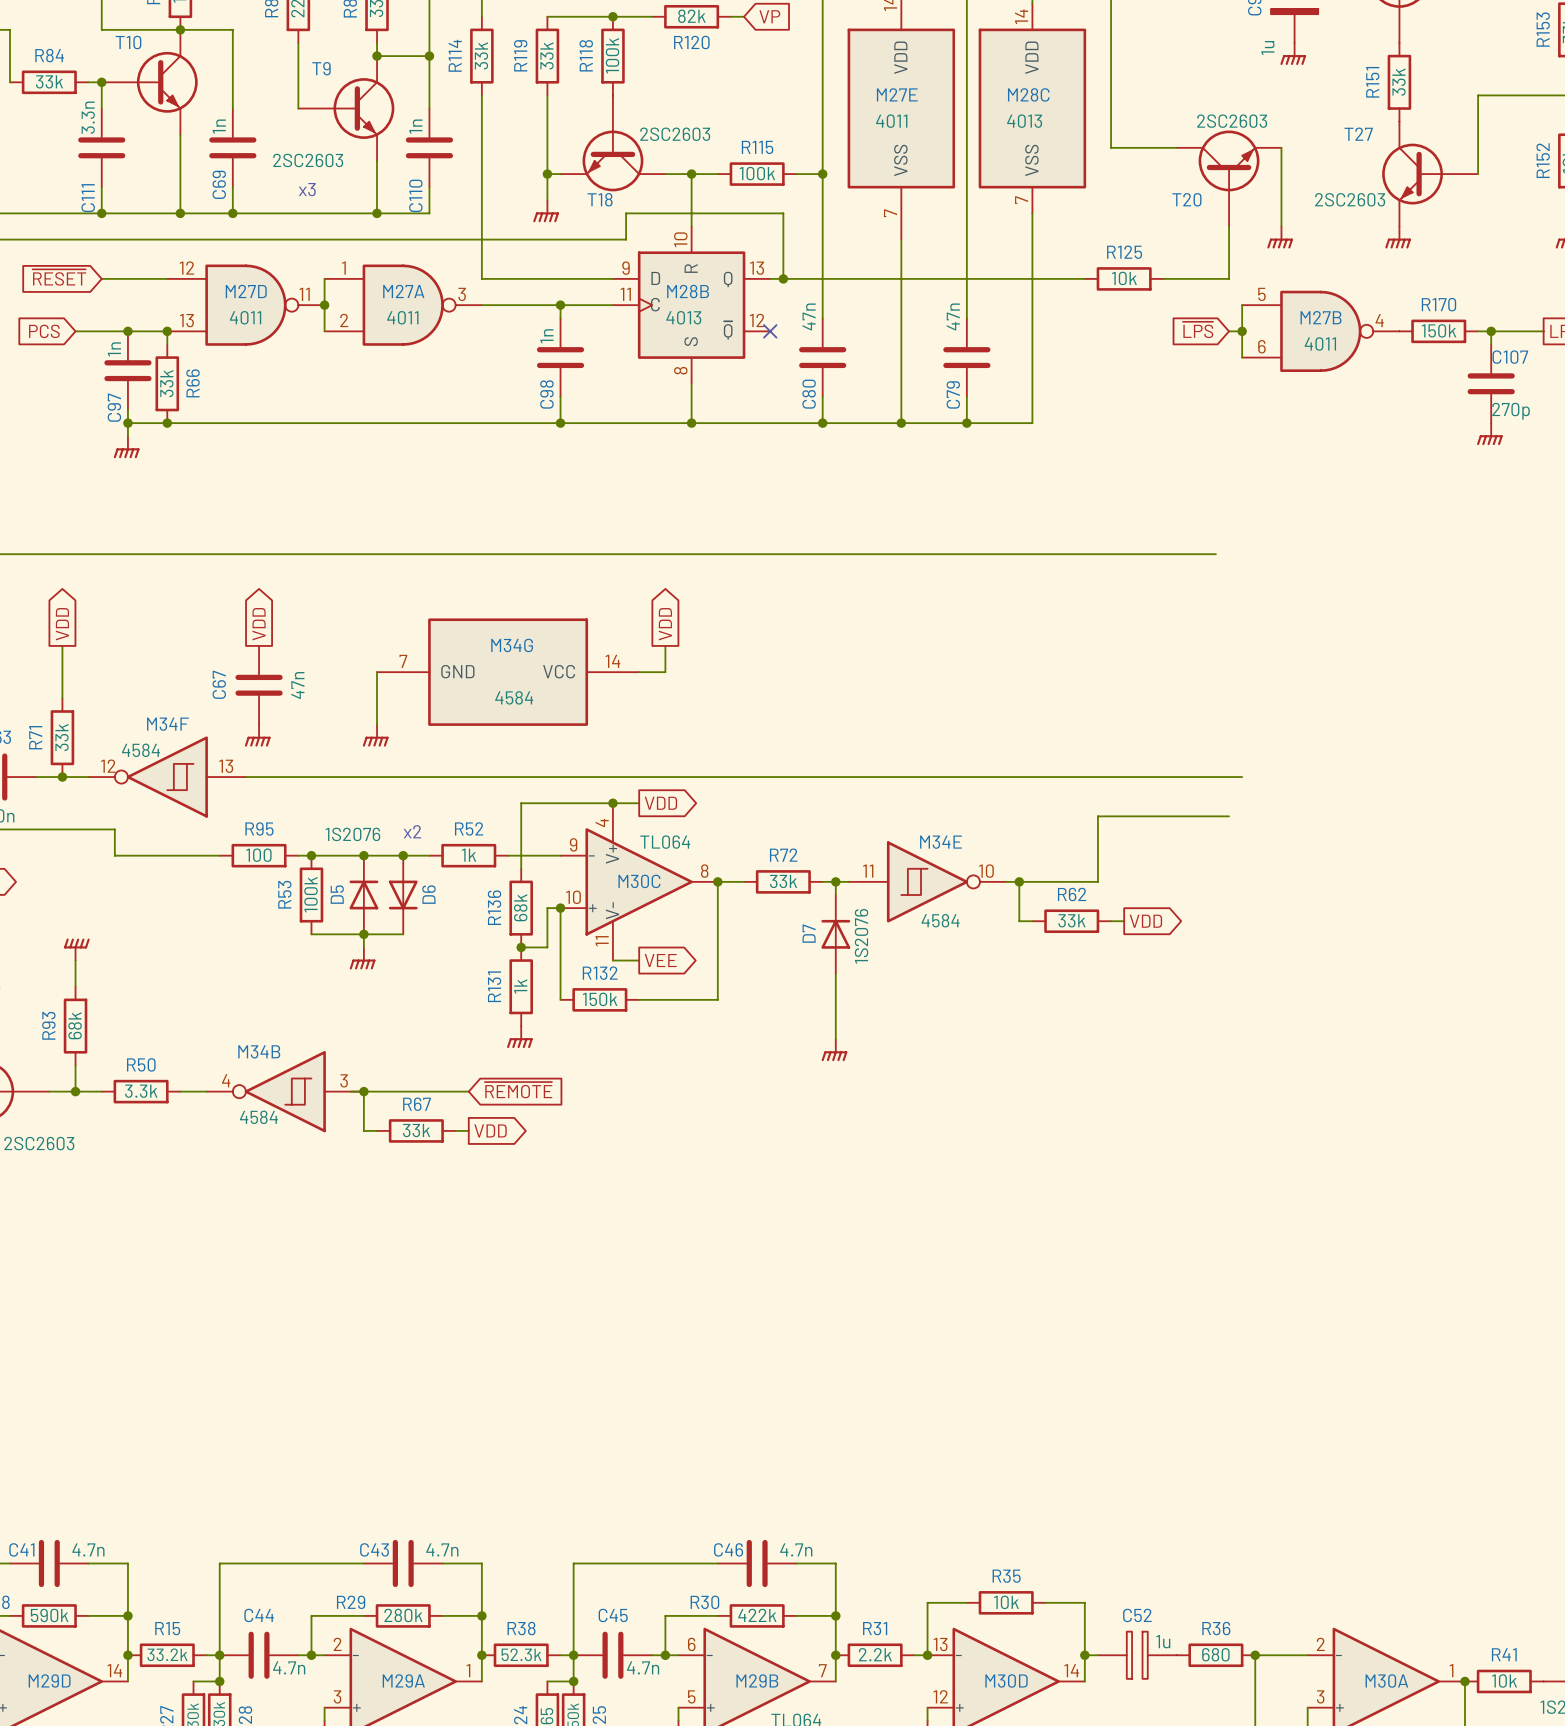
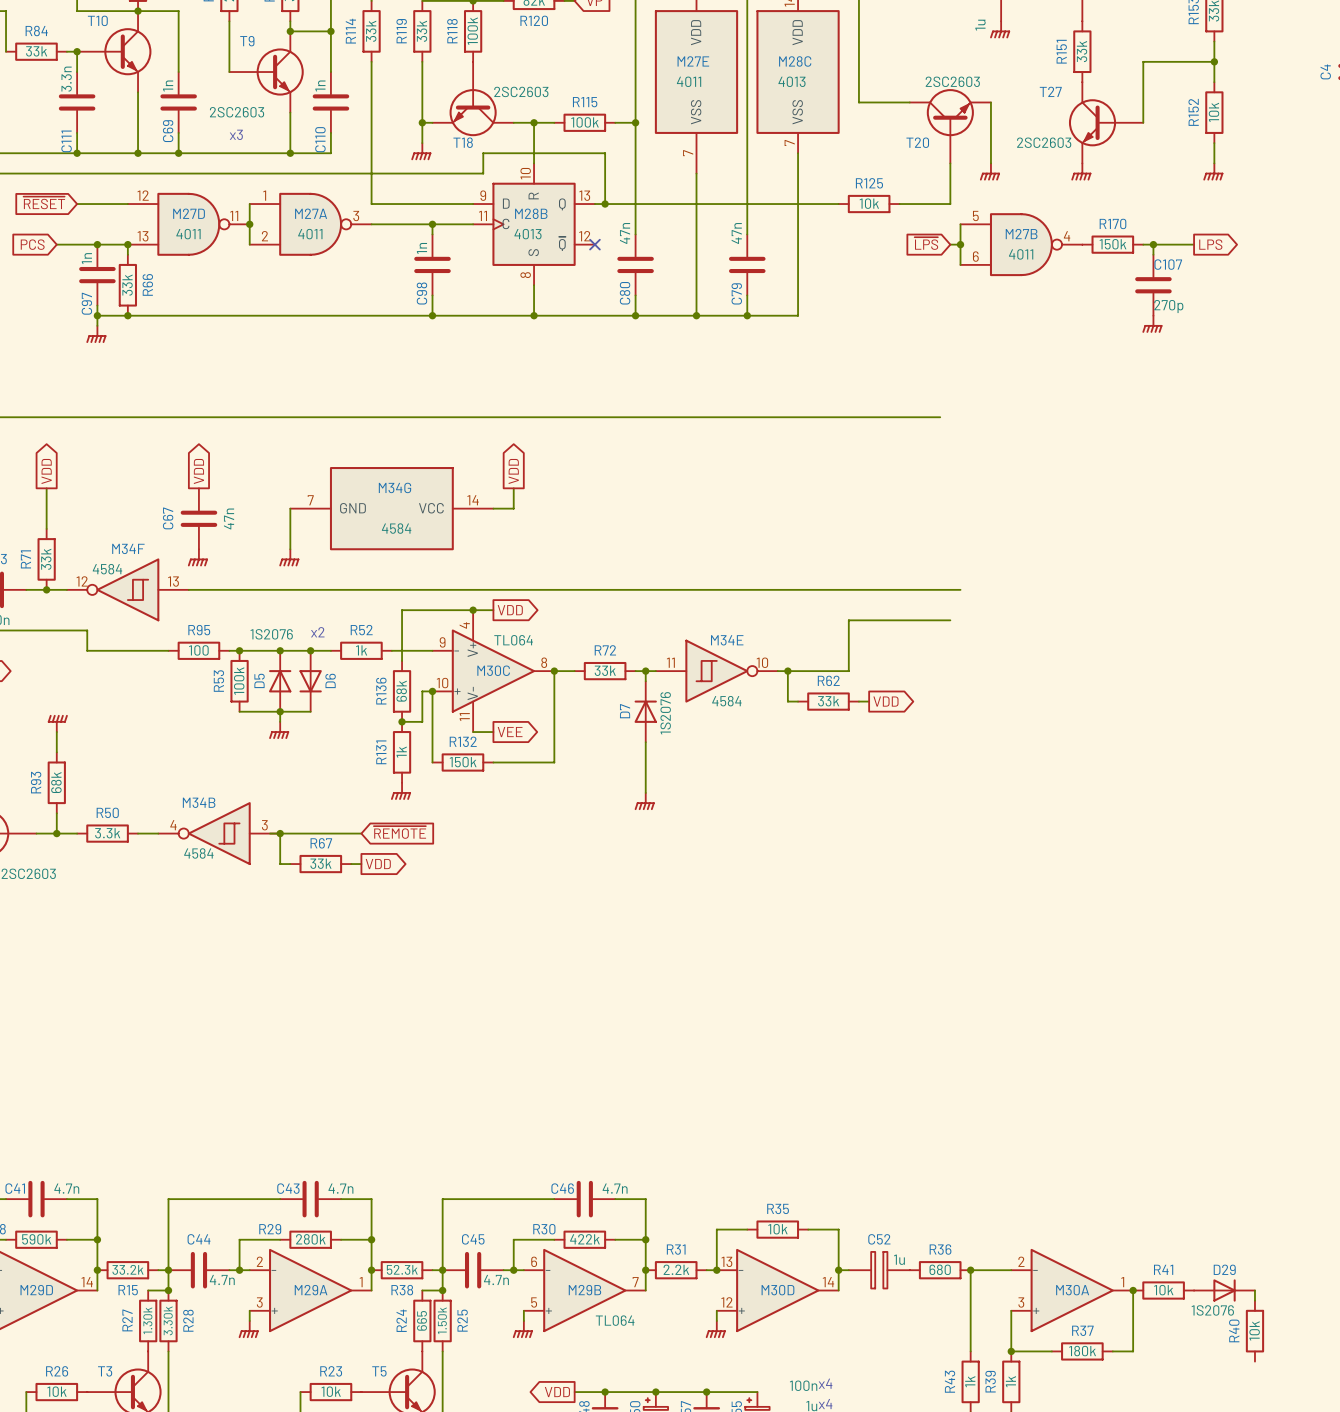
R15 name position: R15 (167, 1628) -> R15 (128, 1290)
R38 name position: R38 (521, 1628) -> R38 (402, 1290)

